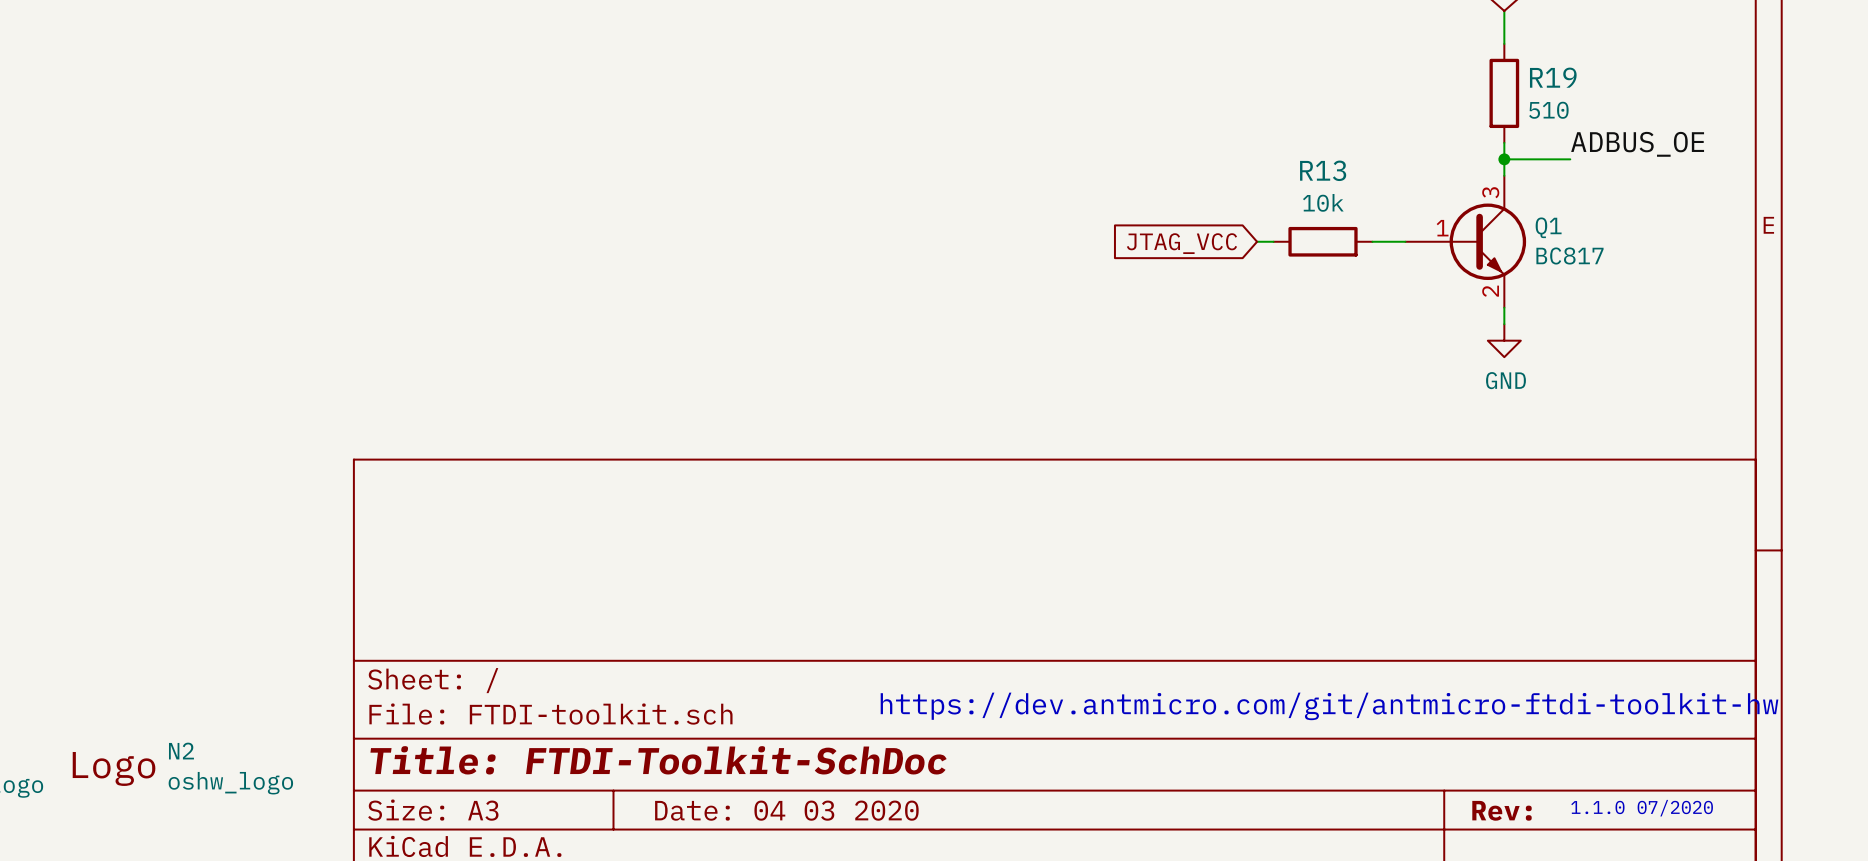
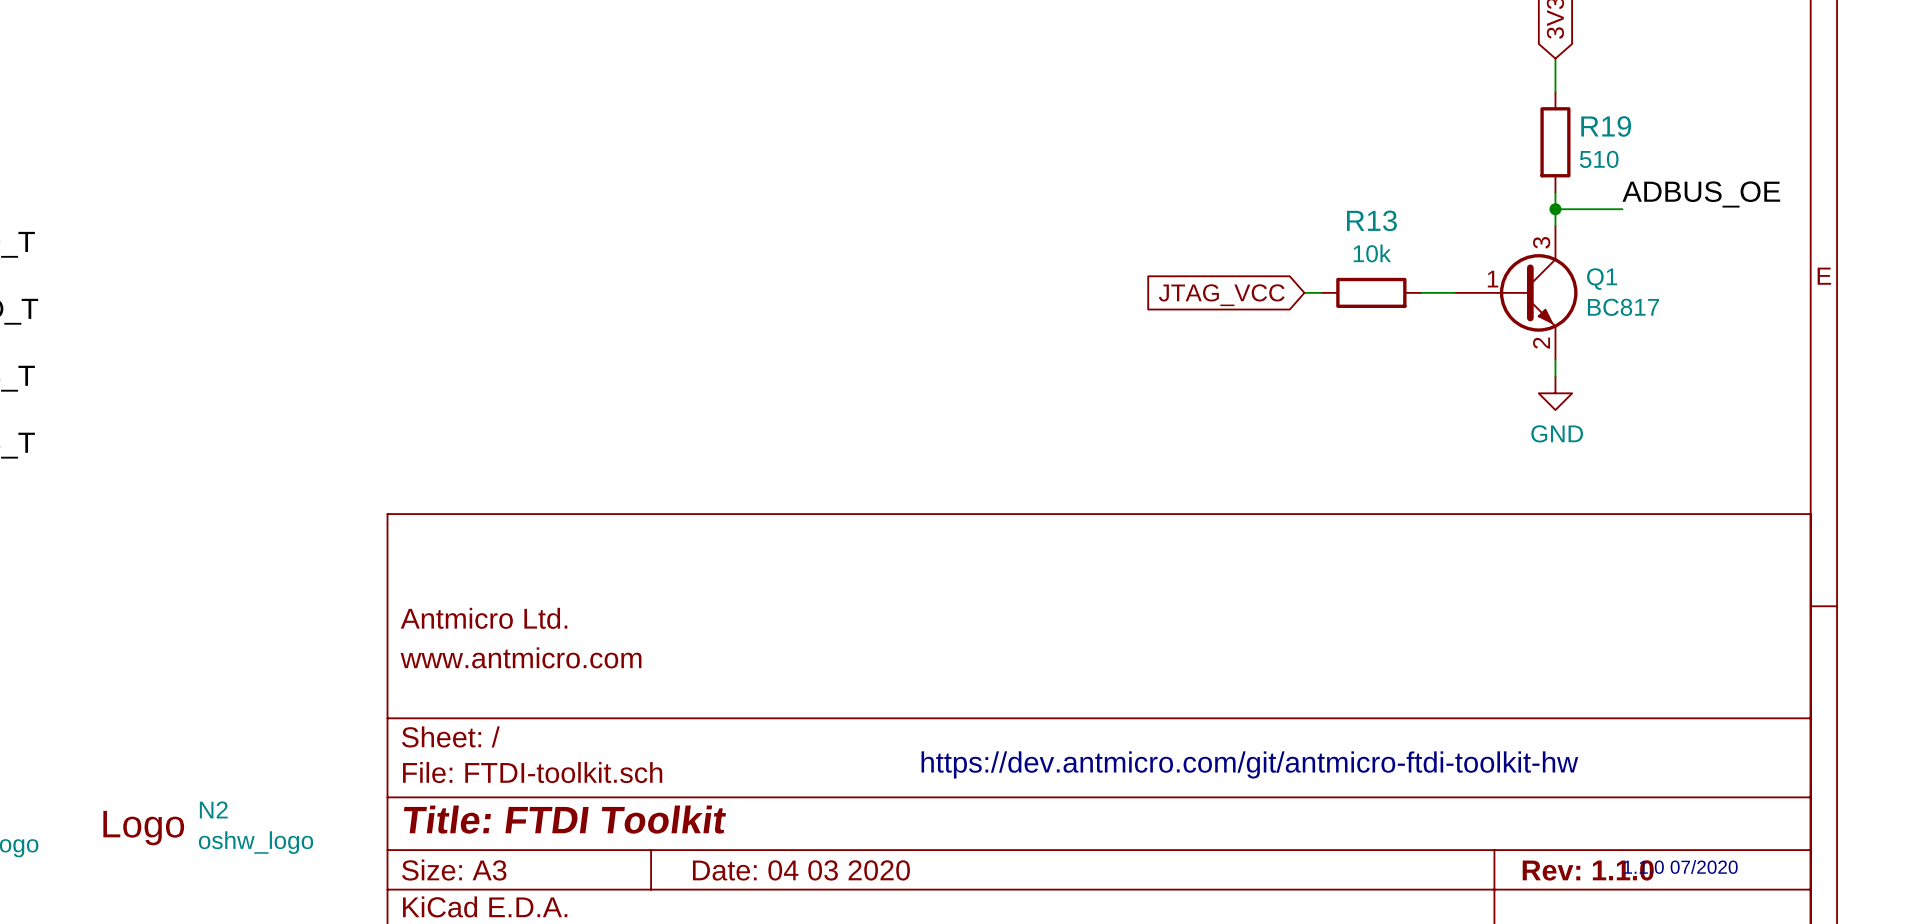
title block: none -> Antmicro Ltd. (484, 618)
title block: none -> www.antmicro.com (521, 657)
title block: Title: FTDI-Toolkit-SchDoc (658, 760) -> Title: FTDI Toolkit (564, 819)
title block: Rev: (1502, 810) -> Rev: 1.1.0 (1588, 870)

